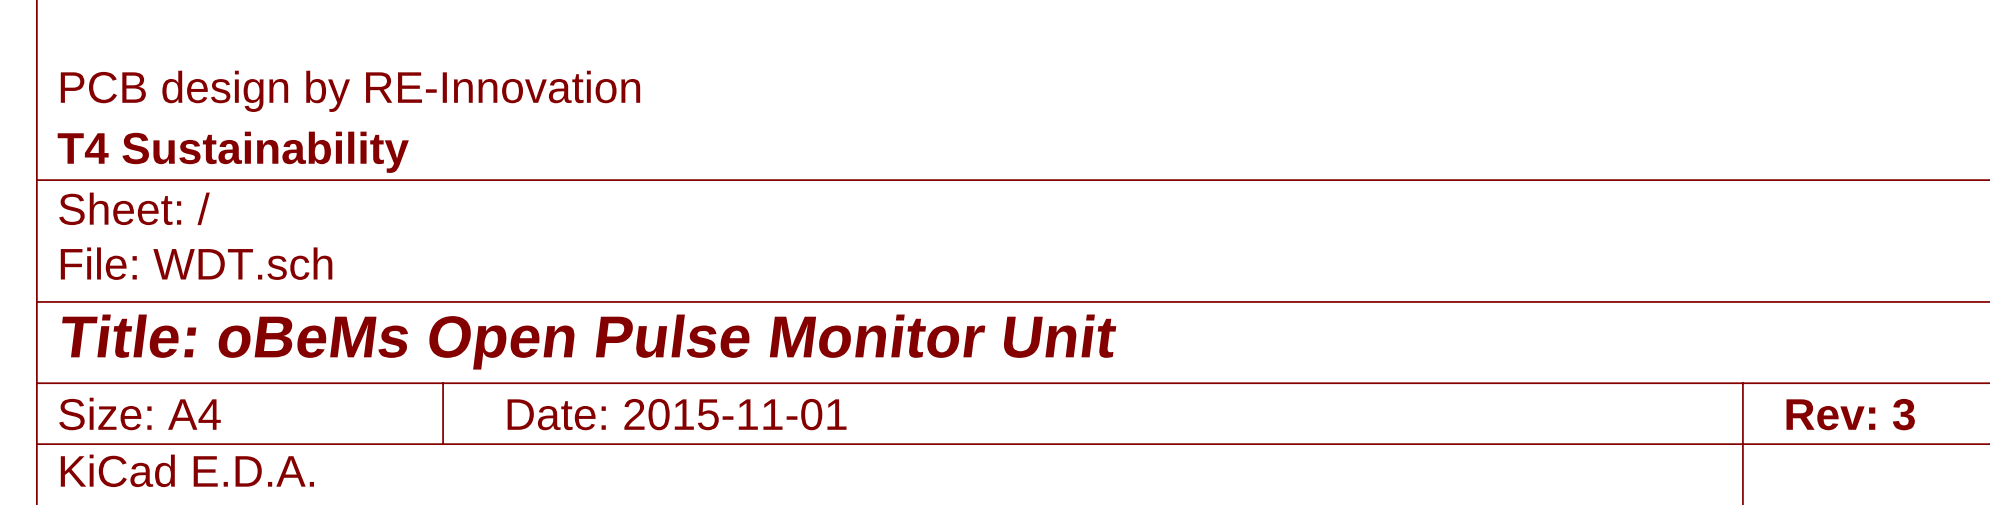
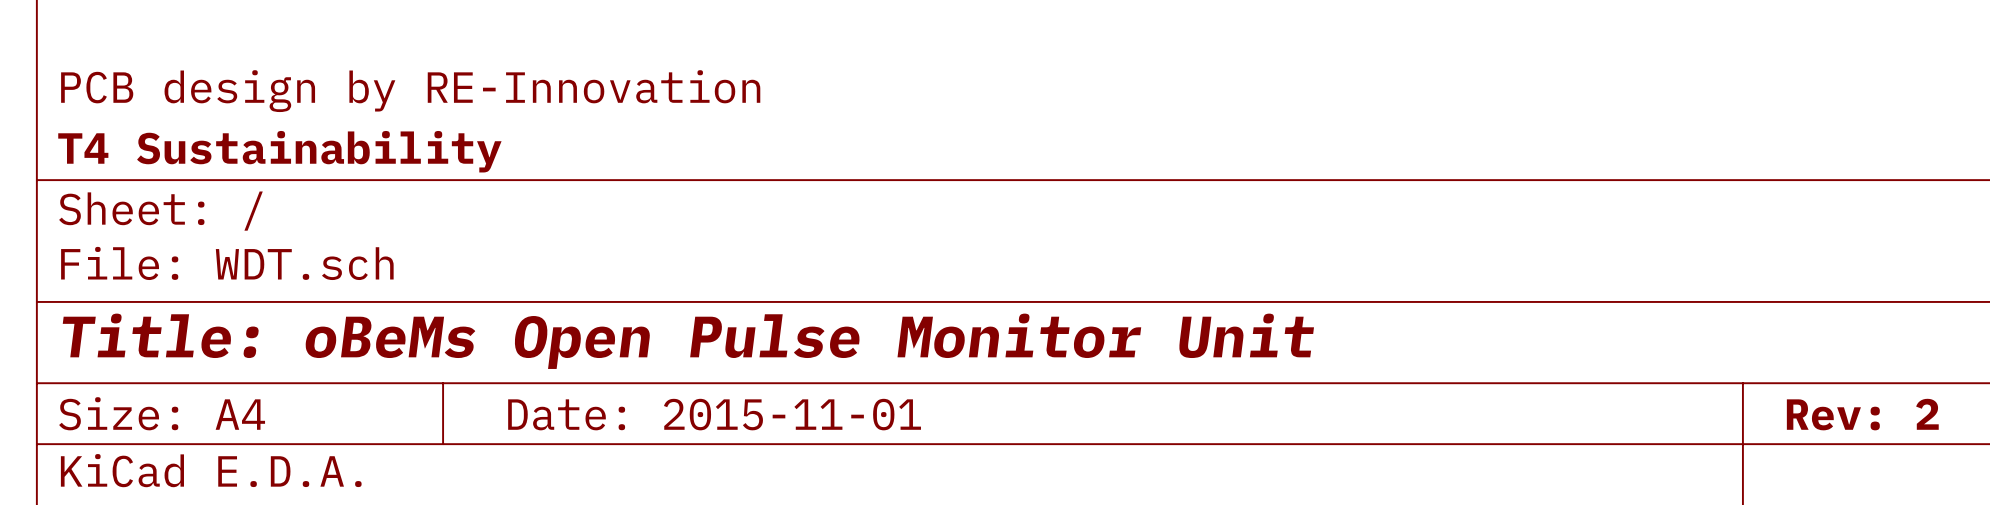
title block: Rev: 3 (1850, 414) -> Rev: 2 (1862, 414)

